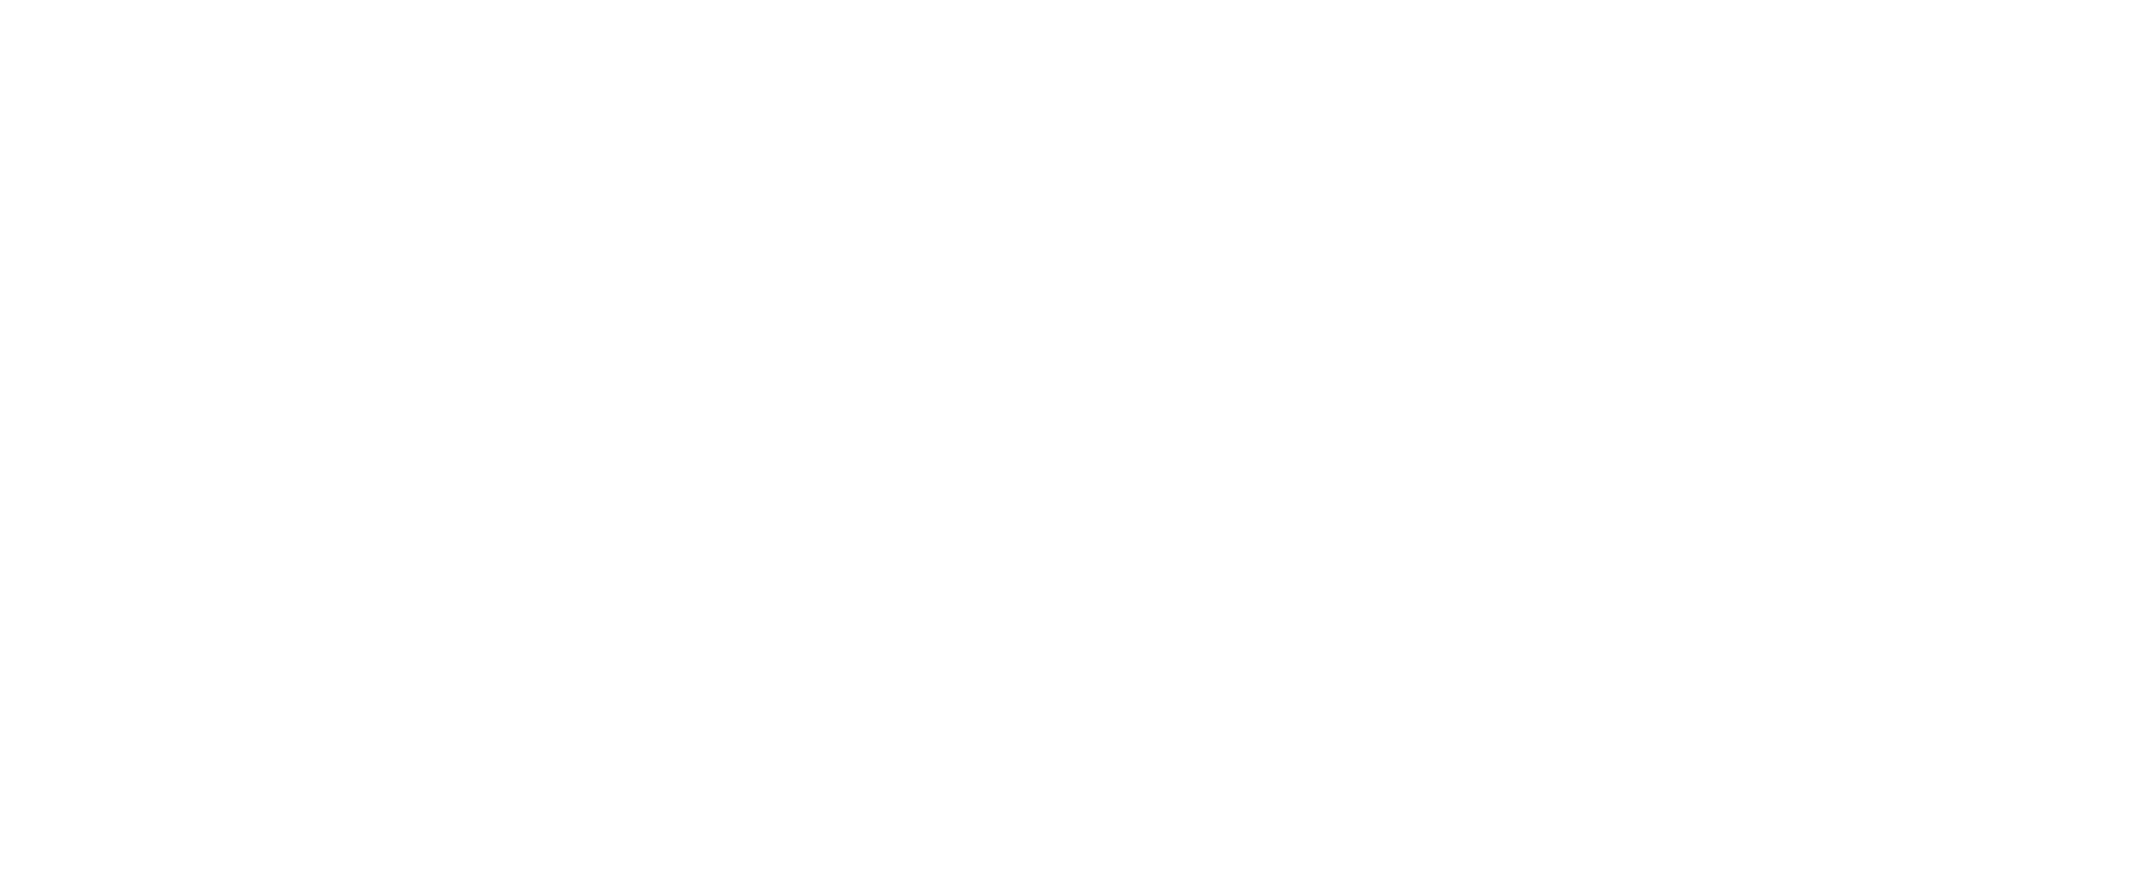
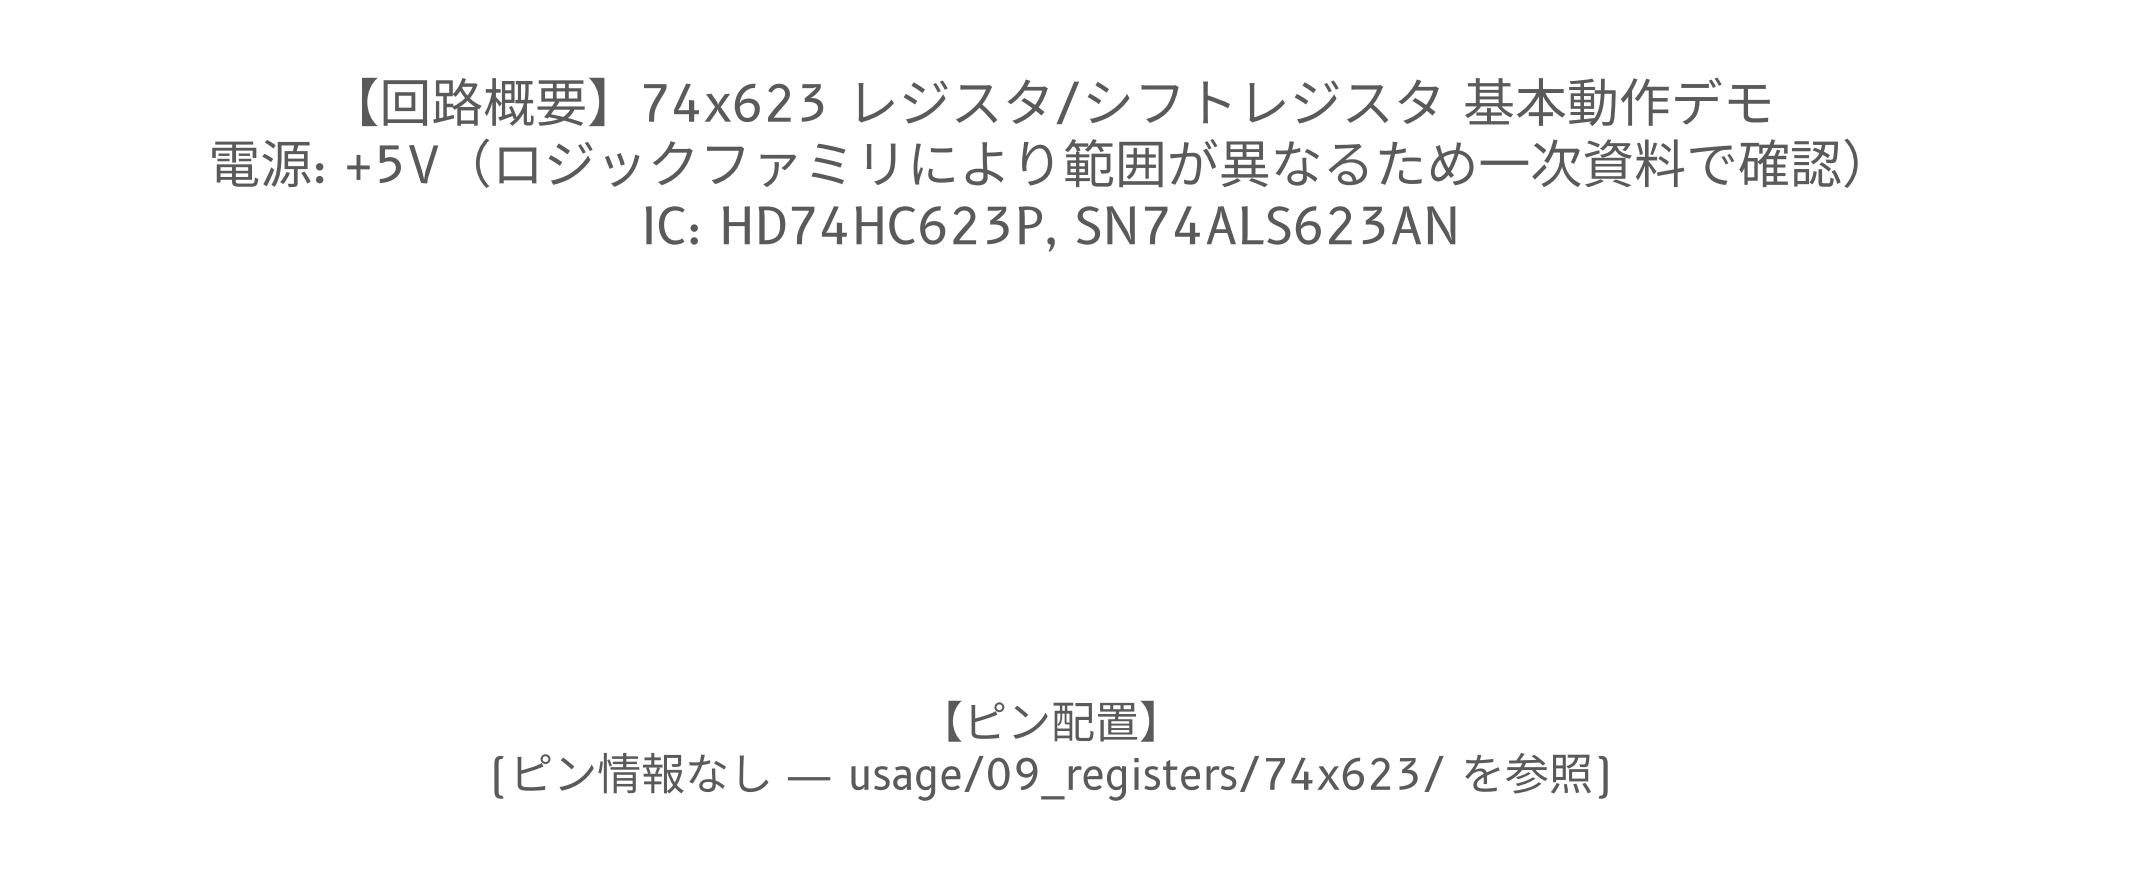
text: none -> 【回路概要】74x623 レジスタ/シフトレジスタ 基本動作デモ (1065, 101)
text: none -> 電源: +5V（ロジックファミリにより範囲が異なるため一次資料で確認） (1034, 163)
text: none -> IC: HD74HC623P, SN74ALS623AN (1050, 229)
text: none -> 【ピン配置】 (1051, 721)
text: none -> (ピン情報なし — usage/09_registers/74x623/ を参照) (1051, 776)

